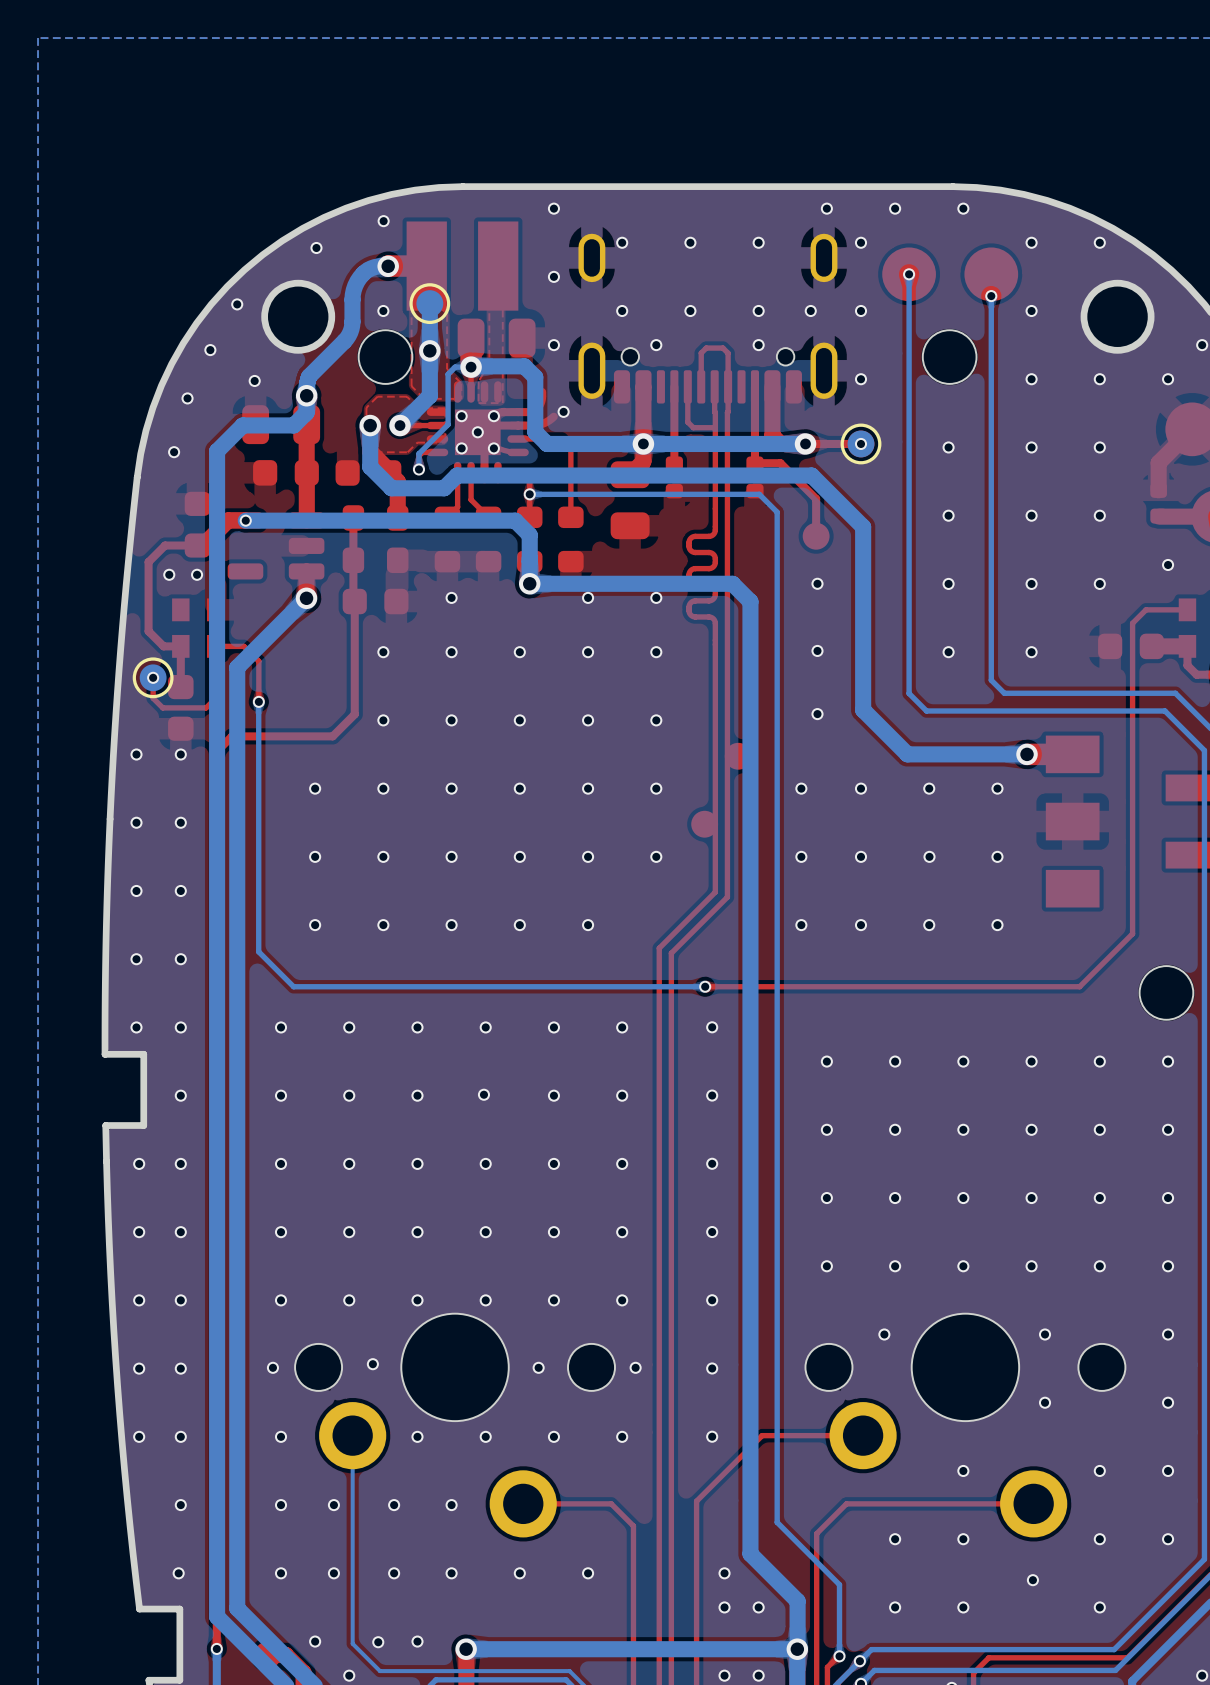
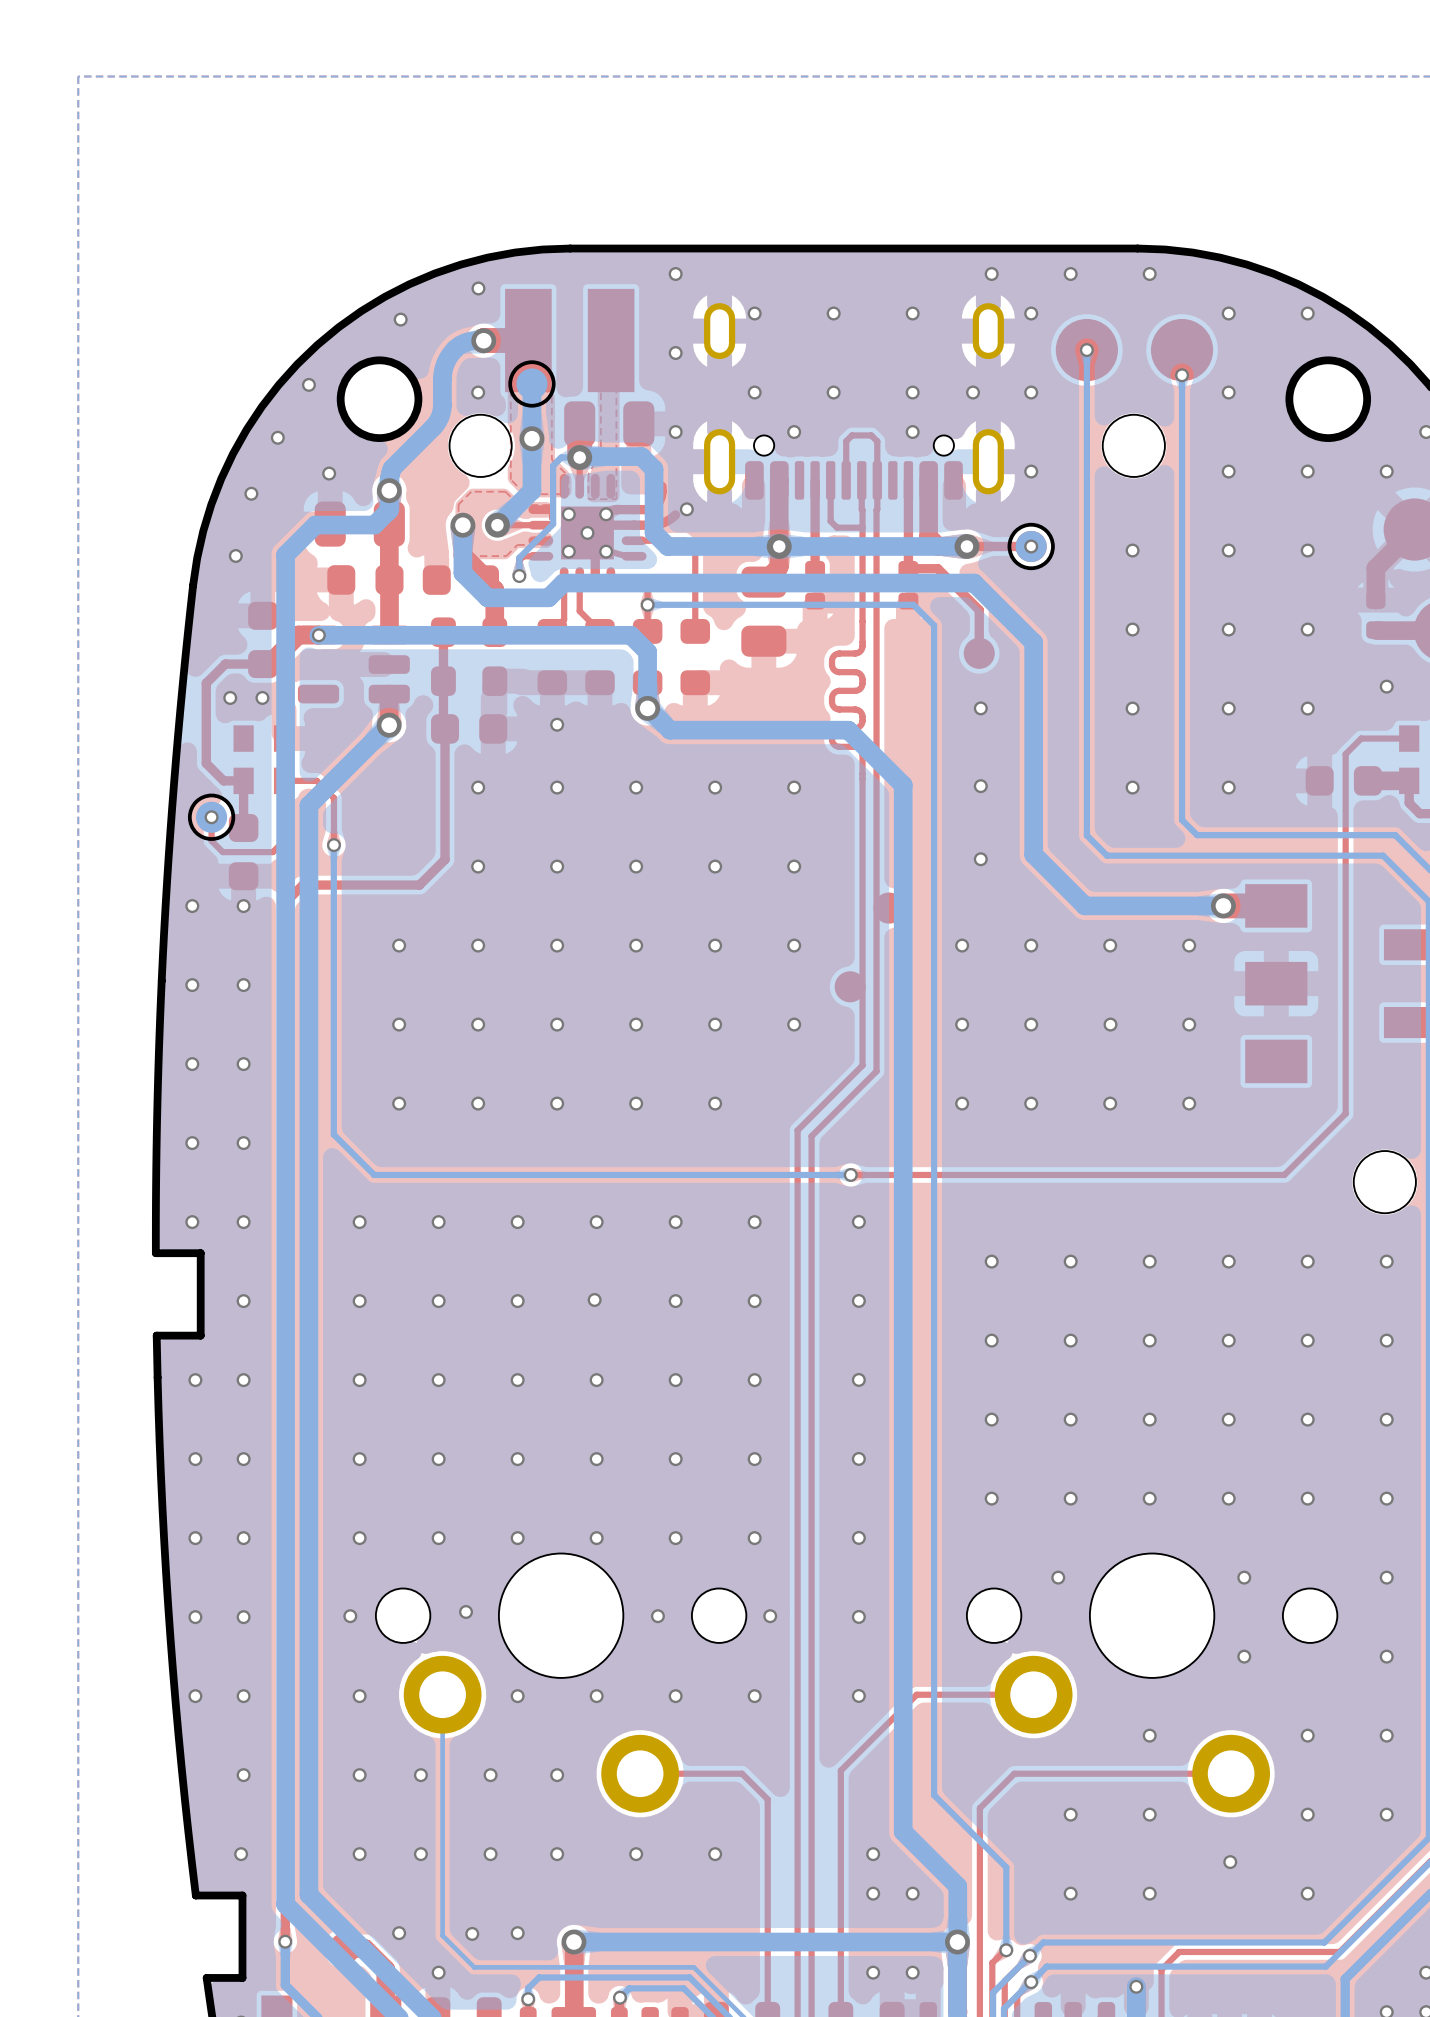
bottom track: (530, 583) (732, 583) (750, 601) (750, 650) -> (648, 708) (670, 730) (848, 730) (903, 785)
via: (588, 597) -> none
via: (656, 597) -> none

